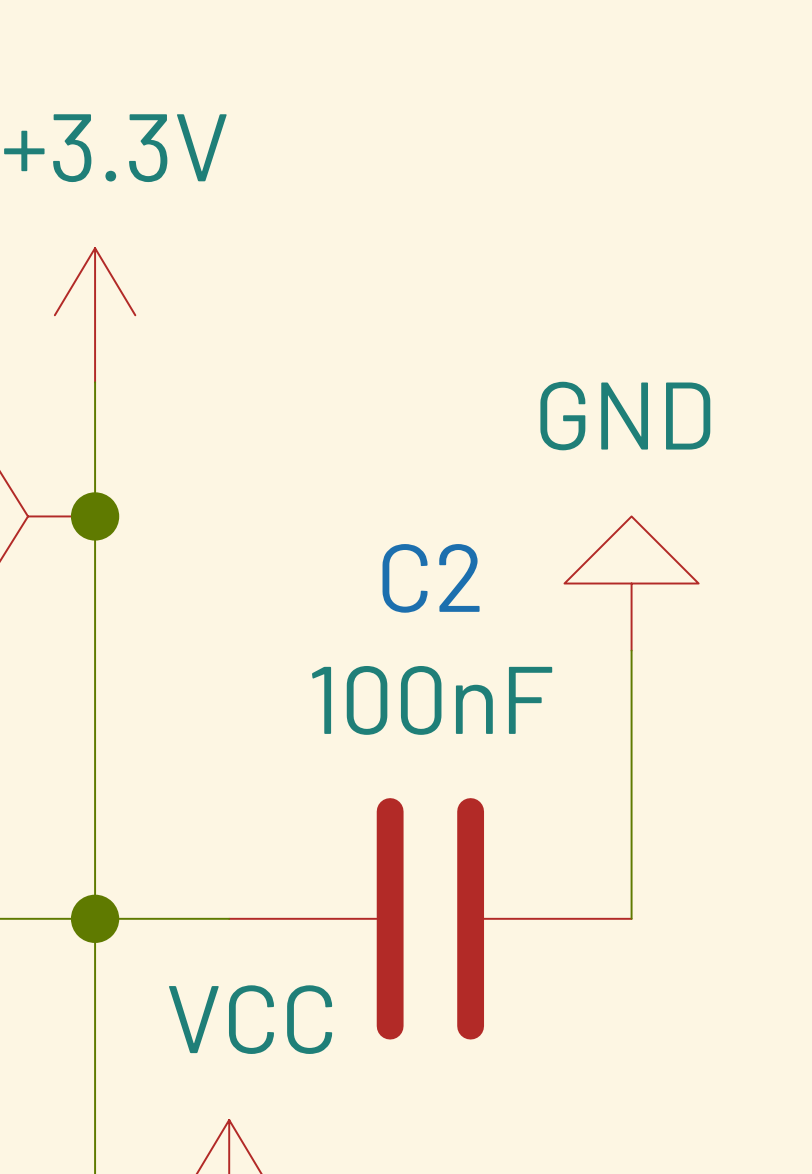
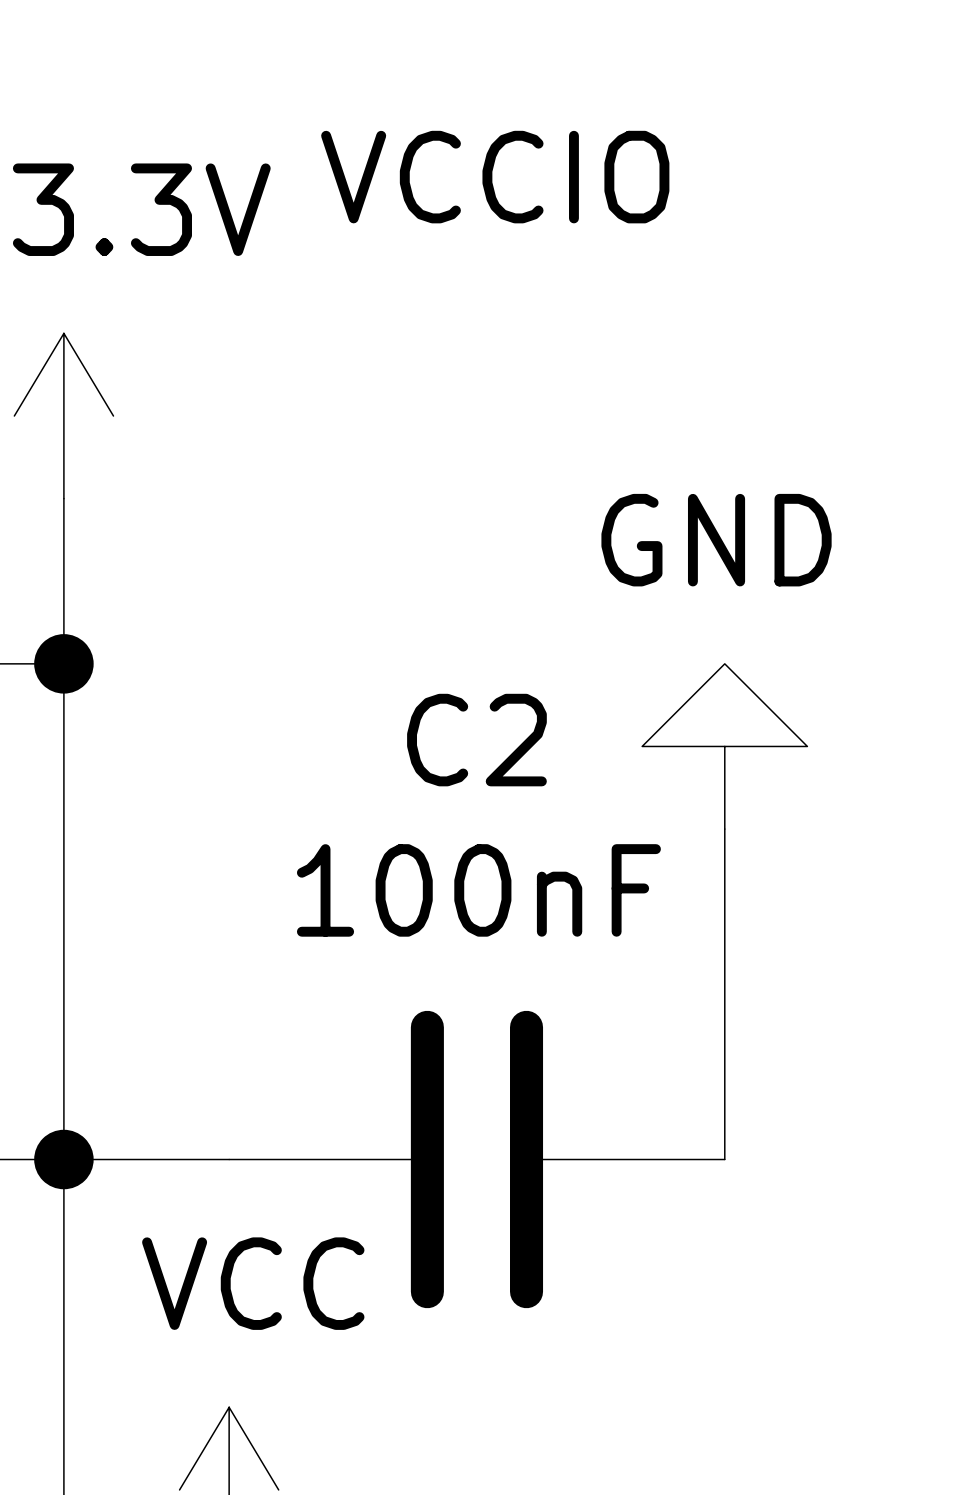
label: none -> VCCIO (495, 177)

